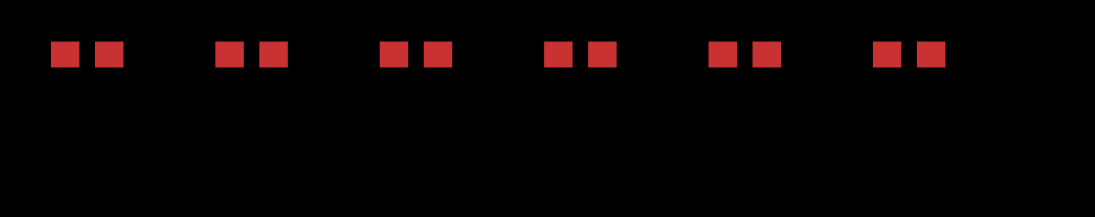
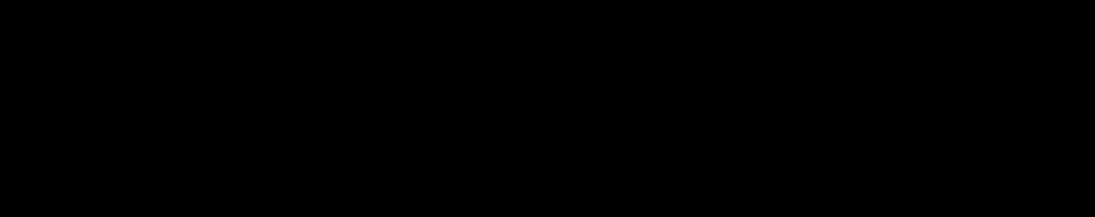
part: (87, 54) -> none
part: (251, 54) -> none
part: (415, 54) -> none
part: (580, 54) -> none
part: (744, 54) -> none
part: (909, 54) -> none

